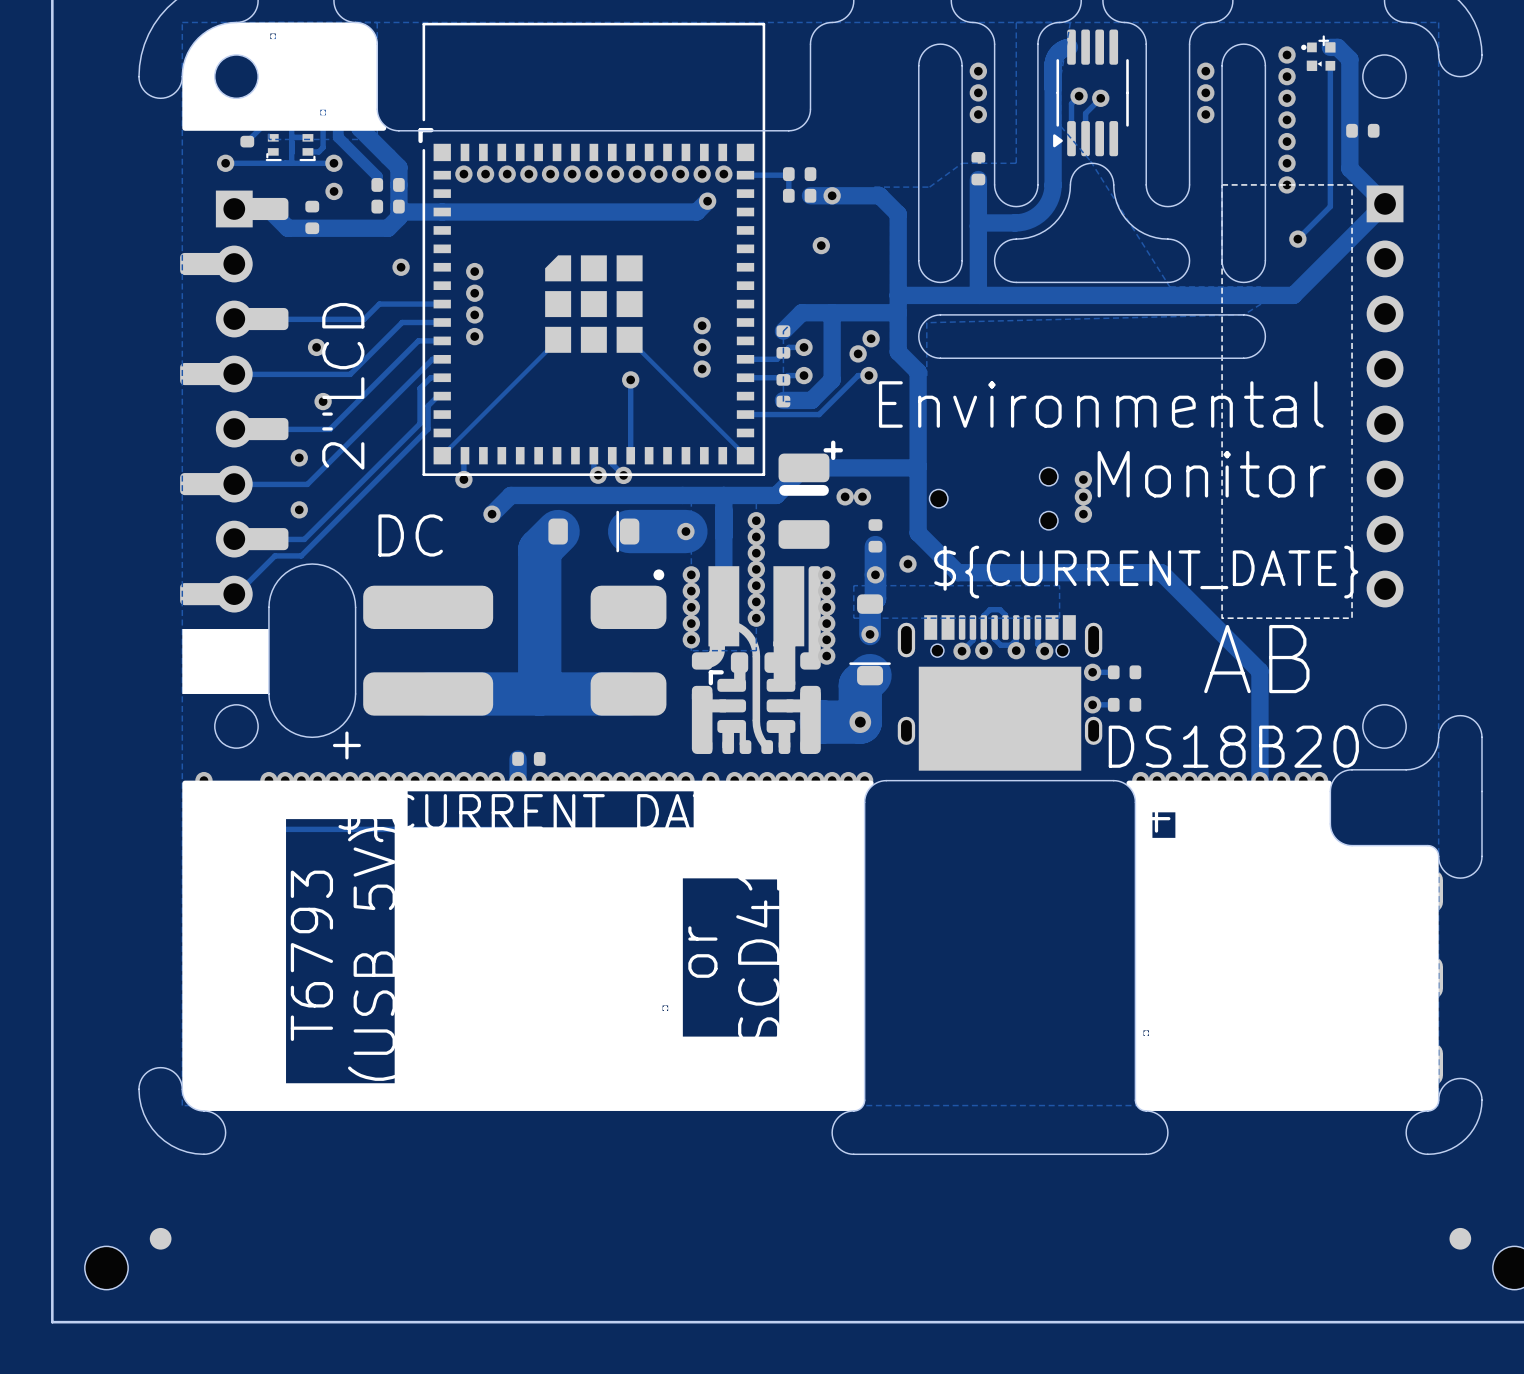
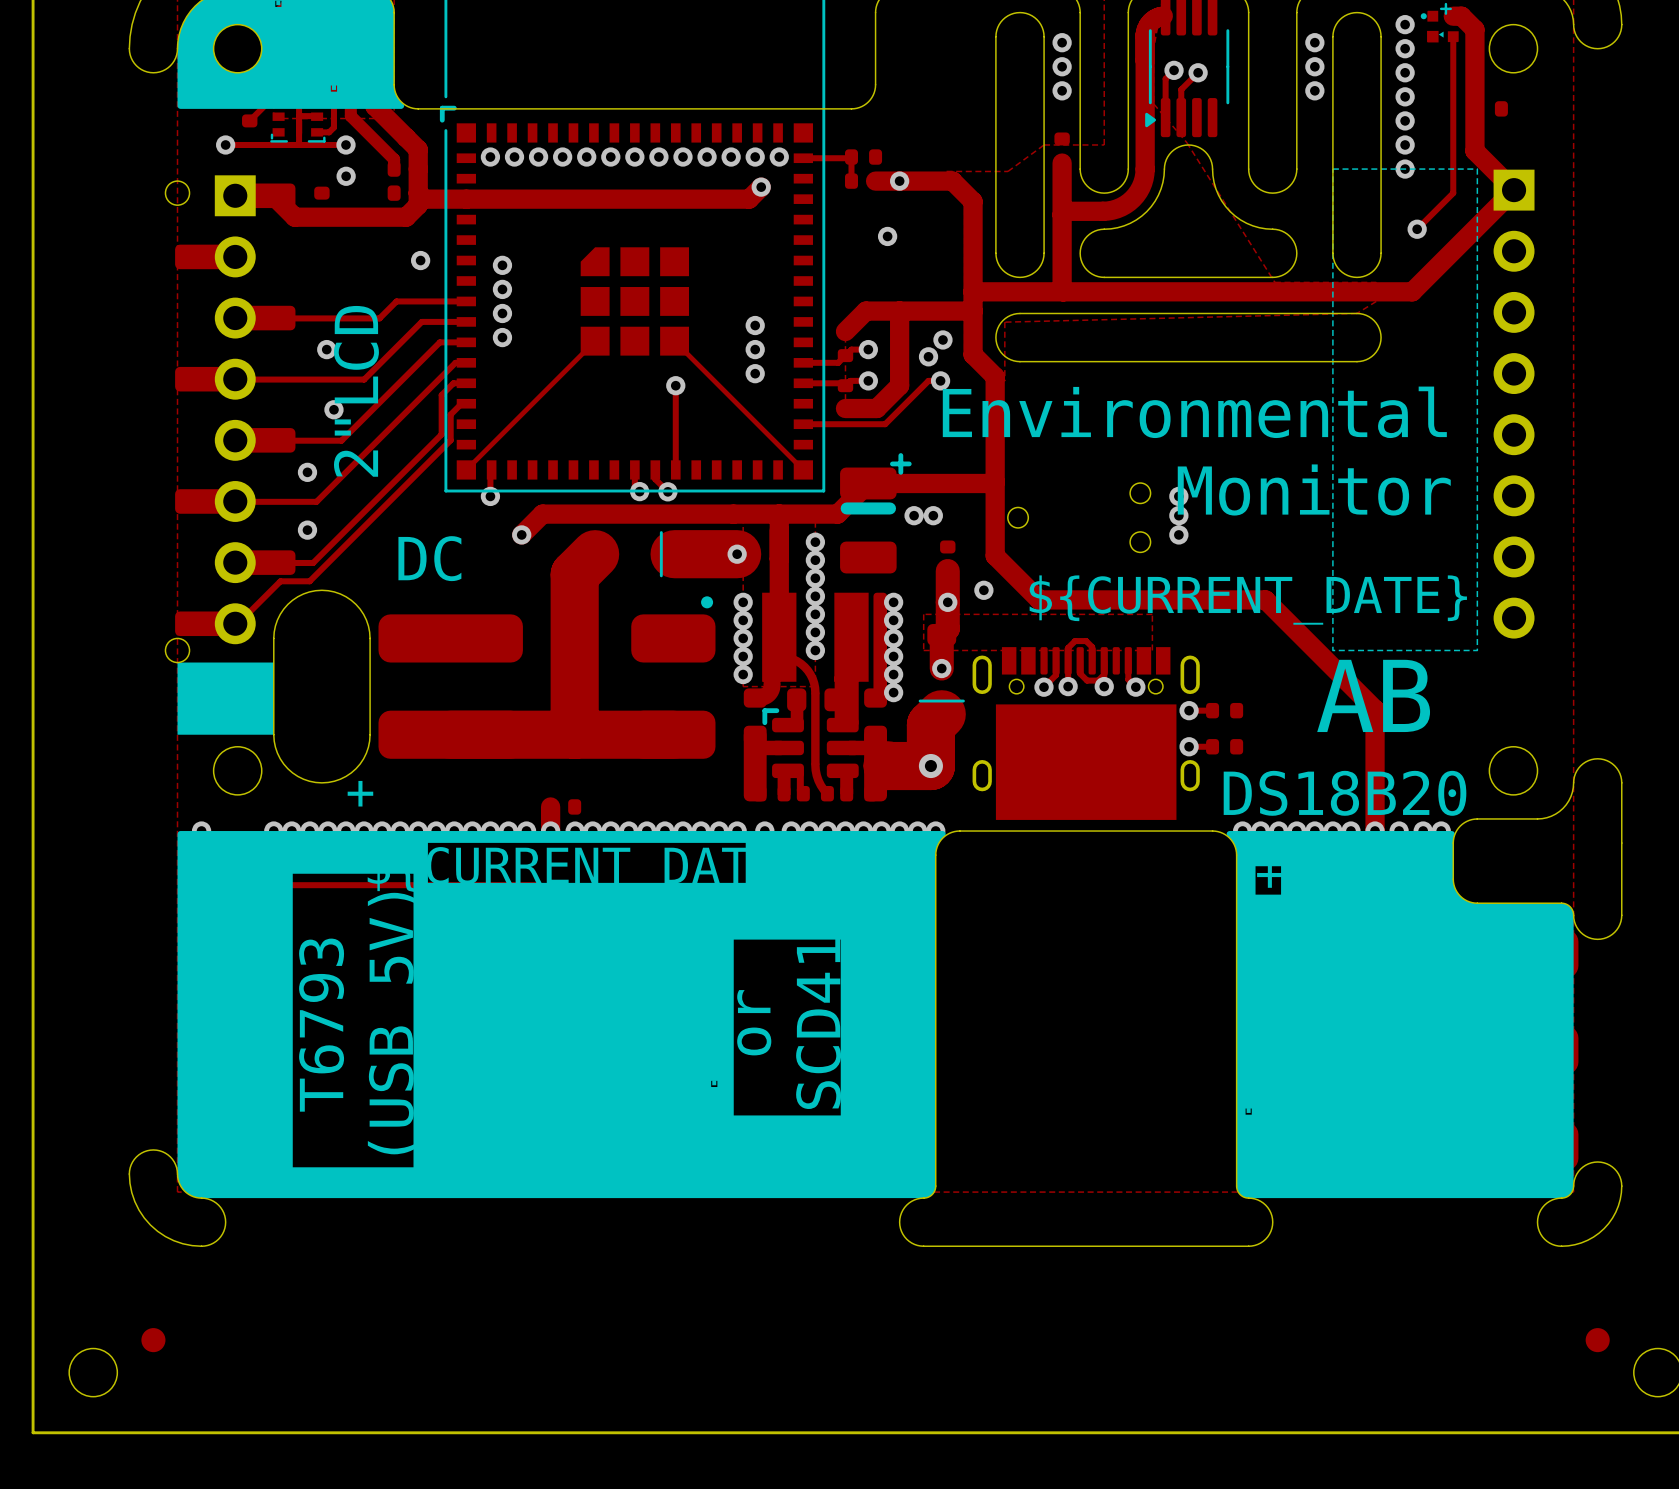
round board edge: none -> [164, 180, 191, 206]
round board edge: none -> [164, 637, 191, 664]

